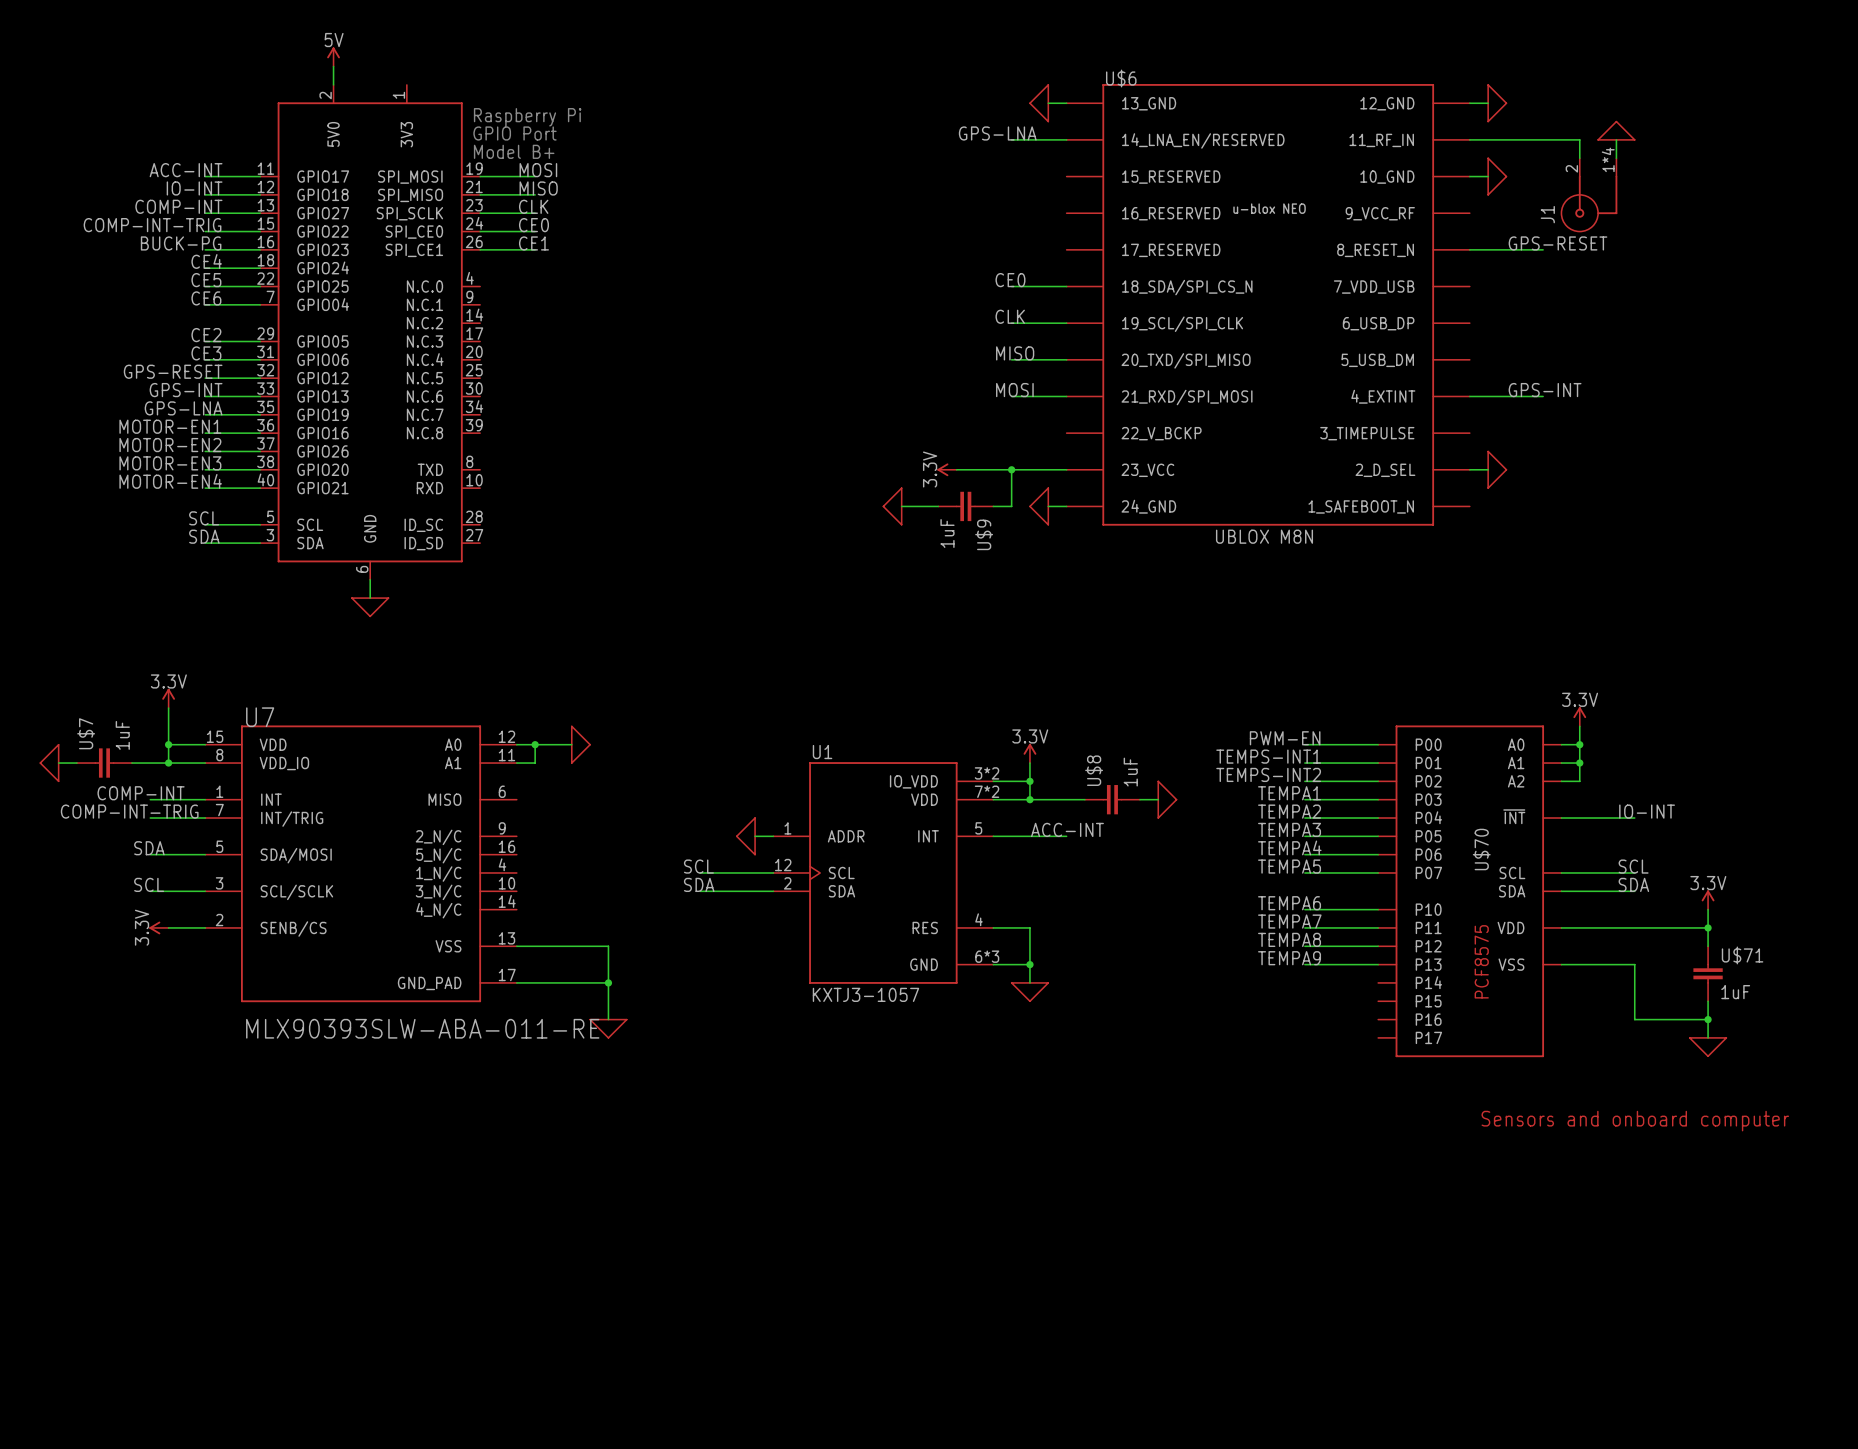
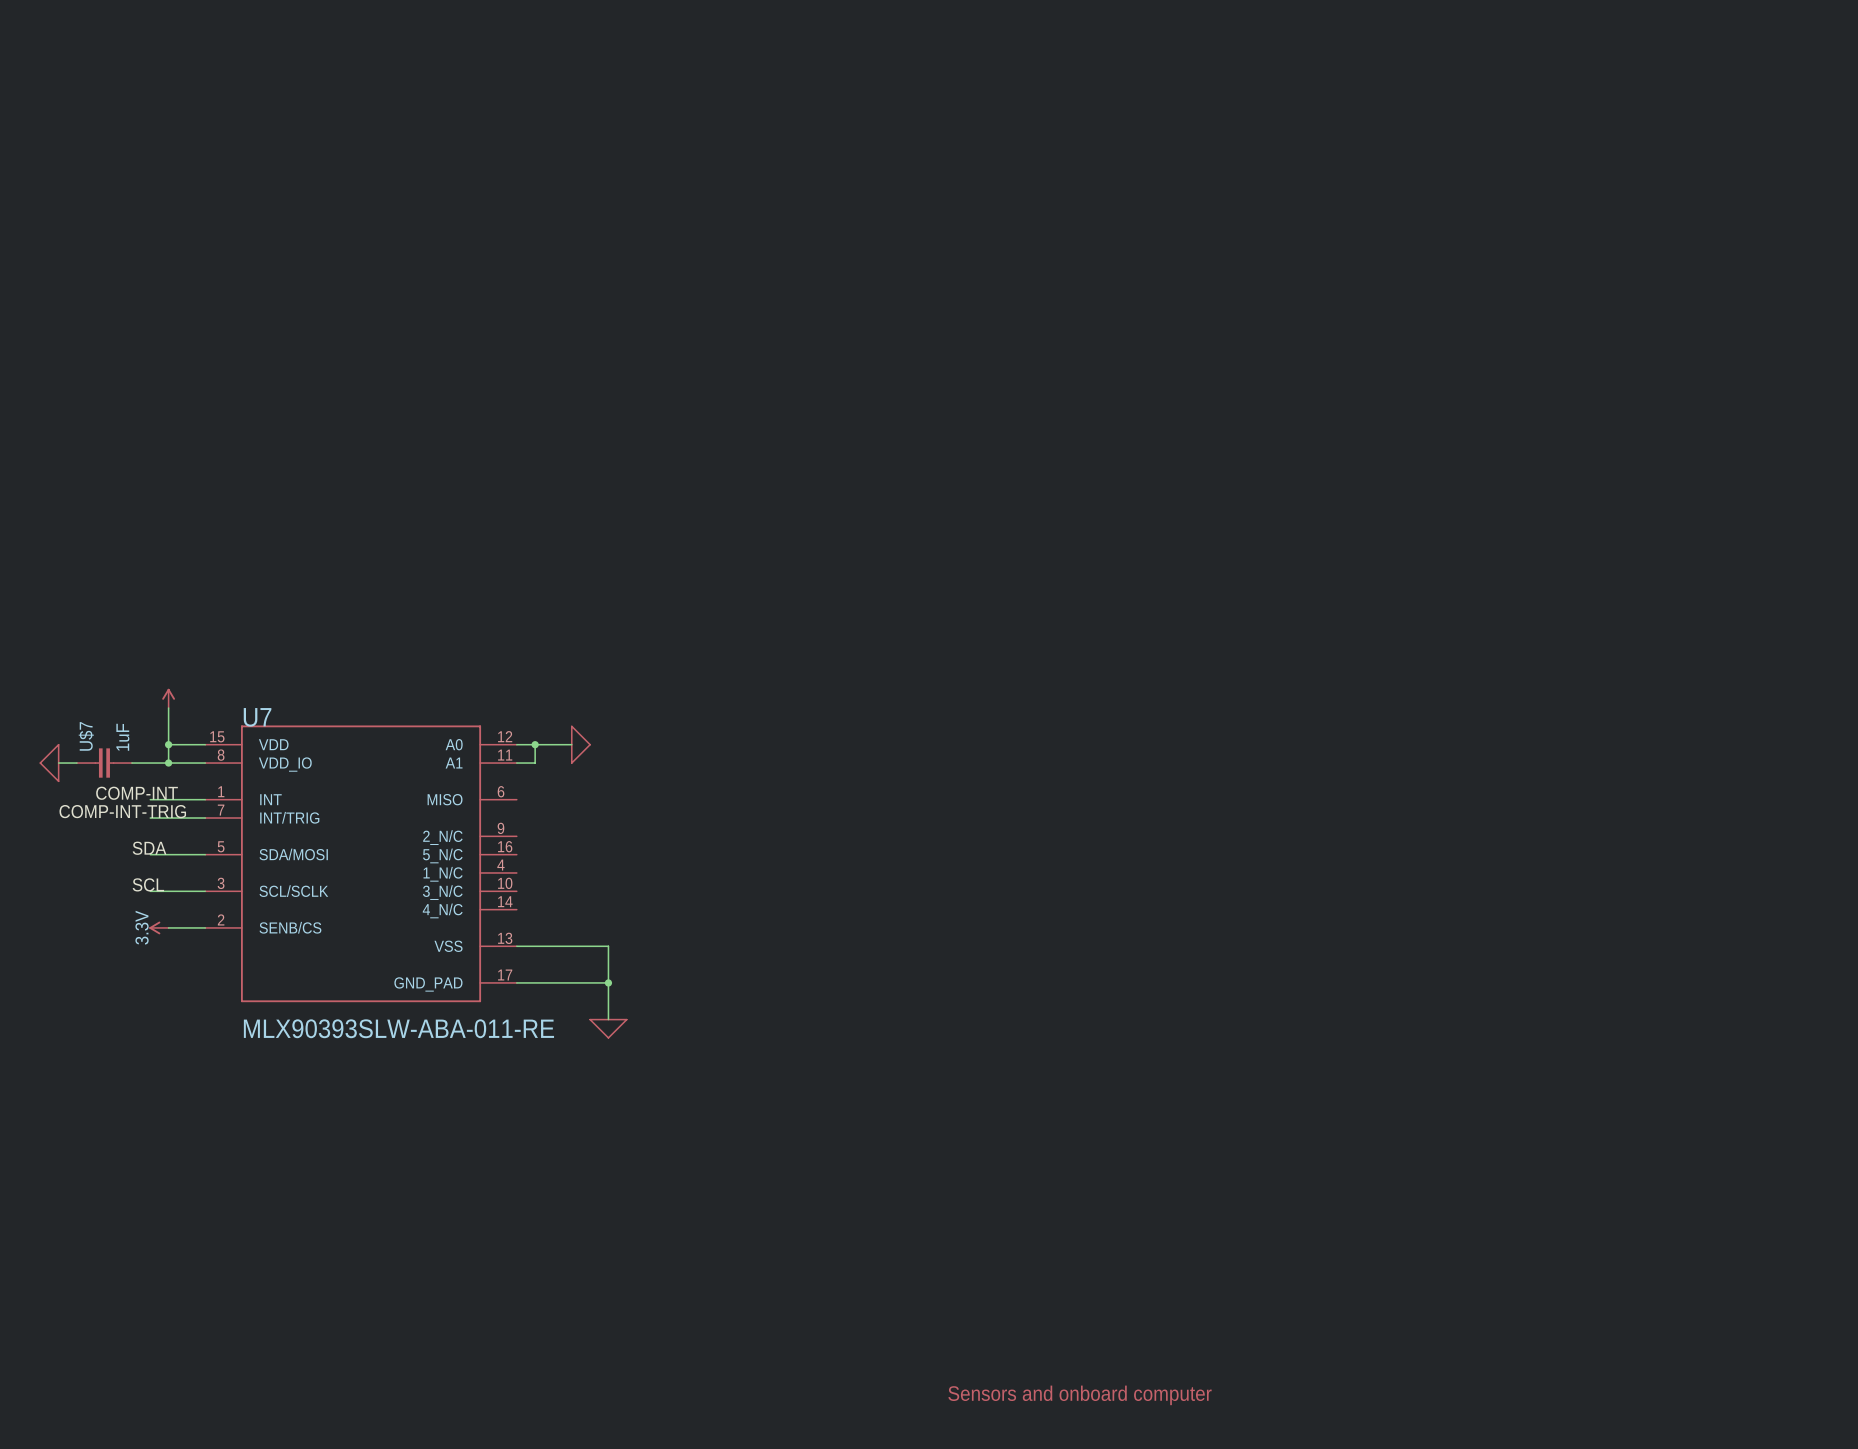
power symbol: 5V (333, 56) -> none
wire: (333, 66) (333, 84) -> none
power symbol: (1039, 103) -> none
wire: (1048, 103) (1066, 103) -> none
wire: (1469, 103) (1488, 103) -> none
power symbol: (1497, 103) -> none
power symbol: (1616, 130) -> none
label: GPS-LNA (997, 133) -> none
wire: (1011, 139) (1066, 139) -> none
wire: (1469, 139) (1579, 139) (1579, 158) -> none
wire: (1616, 139) (1616, 158) -> none
label: ACC-INT (186, 170) -> none
label: MOSI (538, 170) -> none
wire: (205, 176) (260, 176) -> none
wire: (480, 176) (535, 176) -> none
wire: (1469, 176) (1488, 176) -> none
power symbol: (1497, 176) -> none
label: IO-INT (194, 188) -> none
label: MISO (538, 188) -> none
wire: (205, 194) (260, 194) -> none
wire: (480, 194) (535, 194) -> none
J1: (1589, 195) -> none
label: COMP-INT (178, 206) -> none
label: CLK (533, 206) -> none
wire: (205, 213) (260, 213) -> none
wire: (480, 213) (535, 213) -> none
label: COMP-INT-TRIG (152, 225) -> none
label: CE0 (533, 225) -> none
wire: (205, 231) (260, 231) -> none
wire: (480, 231) (535, 231) -> none
label: BUCK-PG (181, 243) -> none
label: CE1 (533, 243) -> none
label: GPS-RESET (1558, 243) -> none
wire: (205, 249) (260, 249) -> none
wire: (480, 249) (535, 249) -> none
wire: (1469, 249) (1543, 249) -> none
label: CE4 (206, 261) -> none
wire: (205, 268) (260, 268) -> none
label: CE5 (206, 280) -> none
label: CE0 (1010, 280) -> none
wire: (205, 286) (260, 286) -> none
wire: (1011, 286) (1066, 286) -> none
label: CE6 (206, 298) -> none
wire: (205, 304) (260, 304) -> none
U$6: (1268, 304) -> none
label: CLK (1010, 316) -> none
wire: (1011, 323) (1066, 323) -> none
part: (370, 332) -> none
label: CE2 (206, 335) -> none
wire: (205, 341) (260, 341) -> none
label: CE3 (206, 353) -> none
label: MISO (1015, 353) -> none
wire: (205, 359) (260, 359) -> none
wire: (1011, 359) (1066, 359) -> none
label: GPS-RESET (173, 371) -> none
wire: (205, 378) (260, 378) -> none
label: GPS-INT (186, 390) -> none
label: MOSI (1014, 390) -> none
label: GPS-INT (1545, 390) -> none
wire: (205, 396) (260, 396) -> none
wire: (1011, 396) (1066, 396) -> none
wire: (1469, 396) (1543, 396) -> none
label: GPS-LNA (183, 408) -> none
wire: (205, 414) (260, 414) -> none
label: MOTOR-EN1 (170, 426) -> none
wire: (205, 433) (260, 433) -> none
label: MOTOR-EN2 (170, 445) -> none
wire: (205, 451) (260, 451) -> none
label: MOTOR-EN3 (170, 463) -> none
wire: (205, 469) (260, 469) -> none
power symbol: 3.3V (947, 469) -> none
wire: (956, 469) (1066, 469) -> none
wire: (1011, 469) (1011, 506) (993, 506) -> none
junction: (1011, 469) -> none
wire: (1469, 469) (1488, 469) -> none
power symbol: (1497, 469) -> none
label: MOTOR-EN4 (170, 481) -> none
wire: (205, 488) (260, 488) -> none
power symbol: (892, 506) -> none
wire: (901, 506) (938, 506) -> none
U$9: 1uF (965, 506) -> none
power symbol: (1039, 506) -> none
wire: (1048, 506) (1066, 506) -> none
label: SCL (204, 518) -> none
wire: (205, 524) (260, 524) -> none
label: SDA (204, 536) -> none
wire: (205, 543) (260, 543) -> none
wire: (370, 579) (370, 598) -> none
power symbol: (370, 607) -> none
power symbol text: 3.3V (168, 681) -> none
power symbol: 3.3V (1579, 716) -> none
wire: (1579, 726) (1579, 781) (1561, 781) -> none
label: PWM-EN (1285, 738) -> none
wire: (1304, 744) (1378, 744) -> none
wire: (1561, 744) (1579, 744) -> none
junction: (1579, 744) -> none
power symbol: 3.3V (1029, 753) -> none
label: TEMPS-INT1 (1268, 756) -> none
wire: (1029, 763) (1029, 799) -> none
wire: (1304, 763) (1378, 763) -> none
wire: (1561, 763) (1579, 763) -> none
junction: (1579, 763) -> none
label: TEMPS-INT2 (1268, 774) -> none
wire: (993, 781) (1029, 781) -> none
junction: (1029, 781) -> none
wire: (1304, 781) (1378, 781) -> none
label: TEMPA1 (1289, 793) -> none
wire: (993, 799) (1084, 799) -> none
junction: (1029, 799) -> none
U$8: 1uF (1112, 799) -> none
wire: (1139, 799) (1158, 799) -> none
power symbol: (1167, 799) -> none
wire: (1304, 799) (1378, 799) -> none
label: TEMPA2 (1289, 811) -> none
label: IO-INT (1647, 811) -> none
wire: (1304, 818) (1378, 818) -> none
wire: (1561, 818) (1634, 818) -> none
label: ACC-INT (1067, 829) -> none
label: TEMPA3 (1289, 829) -> none
power symbol: (745, 836) -> none
wire: (755, 836) (773, 836) -> none
wire: (993, 836) (1066, 836) -> none
wire: (1304, 836) (1378, 836) -> none
label: TEMPA4 (1289, 847) -> none
wire: (1304, 854) (1378, 854) -> none
label: SCL (698, 866) -> none
label: TEMPA5 (1289, 866) -> none
label: SCL (1633, 866) -> none
wire: (700, 872) (773, 872) -> none
U1: KXTJ3-1057 (883, 872) -> none
wire: (1304, 872) (1378, 872) -> none
wire: (1561, 872) (1634, 872) -> none
label: SDA (699, 884) -> none
label: SDA (1633, 884) -> none
wire: (700, 891) (773, 891) -> none
U$70: (1469, 891) -> none
wire: (1561, 891) (1634, 891) -> none
power symbol: 3.3V (1708, 900) -> none
label: TEMPA6 (1289, 903) -> none
wire: (1304, 909) (1378, 909) -> none
wire: (1708, 909) (1708, 946) -> none
label: TEMPA7 (1289, 921) -> none
wire: (993, 927) (1029, 927) (1029, 982) -> none
wire: (1304, 927) (1378, 927) -> none
wire: (1561, 927) (1708, 927) -> none
junction: (1708, 927) -> none
label: TEMPA8 (1289, 939) -> none
wire: (1304, 946) (1378, 946) -> none
label: TEMPA9 (1289, 958) -> none
wire: (993, 964) (1029, 964) -> none
junction: (1029, 964) -> none
wire: (1304, 964) (1378, 964) -> none
wire: (1561, 964) (1634, 964) (1634, 1019) (1708, 1019) -> none
U$71: 1uF (1708, 973) -> none
power symbol: (1029, 992) -> none
wire: (1708, 1001) (1708, 1037) -> none
junction: (1708, 1019) -> none
power symbol: (1708, 1047) -> none
text: Sensors and onboard computer (1635, 1121) -> none
text: none -> Sensors and onboard computer (1080, 1395)

